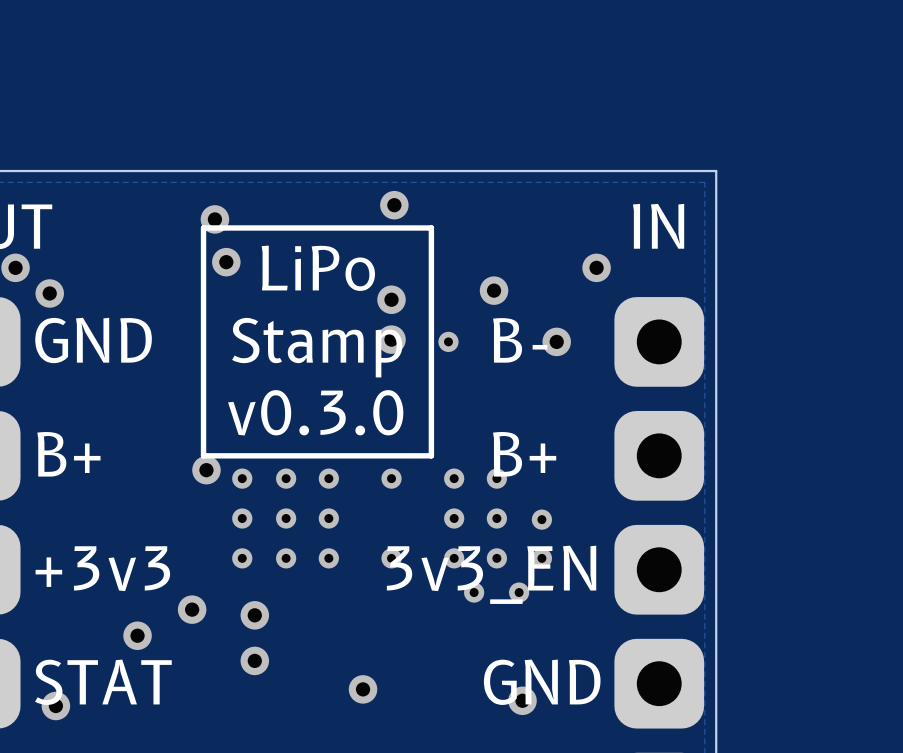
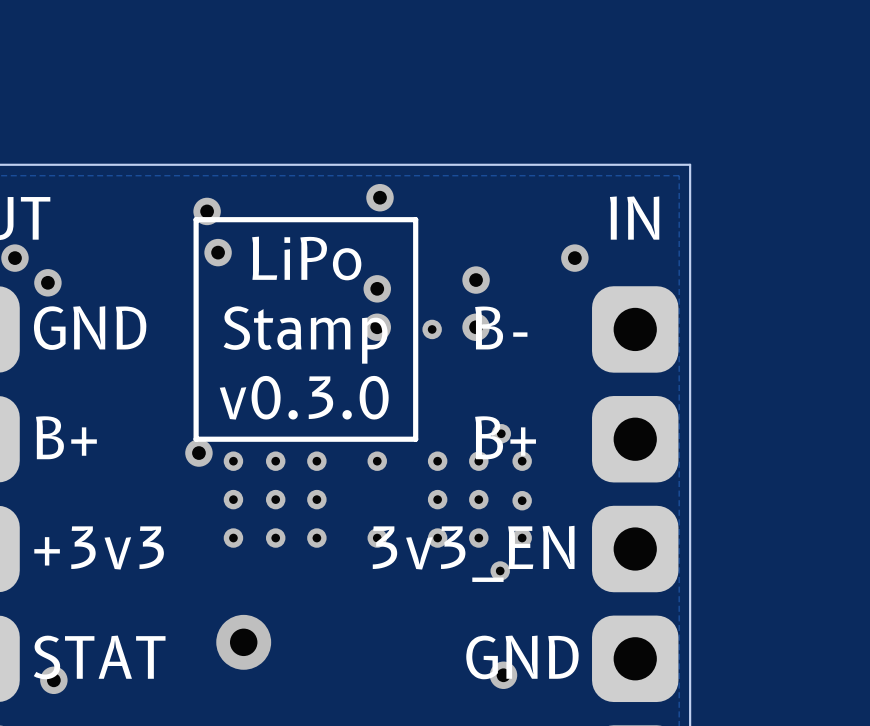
via position: (556, 341) -> (476, 327)
via: none -> (501, 433)
via: none -> (522, 461)
via: (474, 592) -> none
via: (192, 609) -> none
via: (254, 615) -> none
via: (137, 635) -> none
via size: [240, 646, 270, 676] -> [216, 614, 272, 670]
via: (363, 689) -> none

